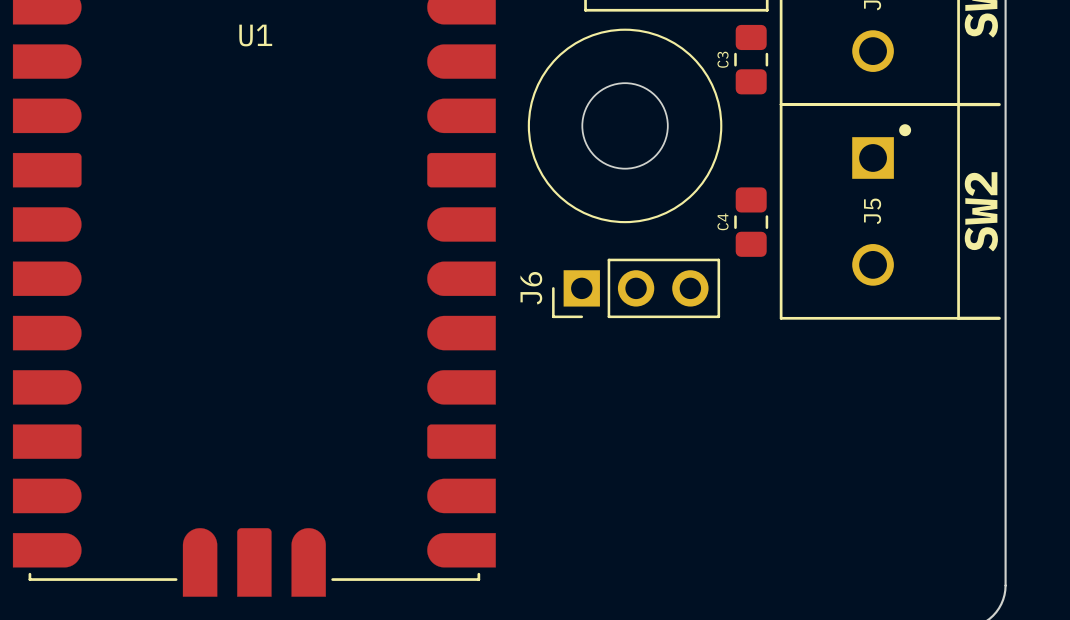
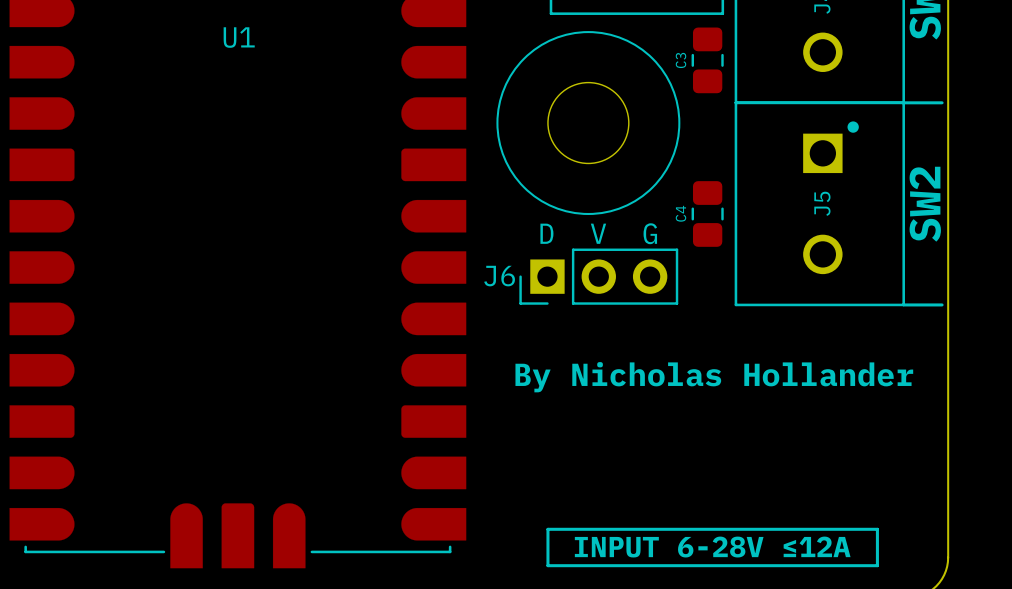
text: none -> D V G (598, 233)
J6 name rotation: 0° (531, 288) -> 90° clockwise (499, 276)
text: none -> By Nicholas Hollander (714, 377)
line: none -> (547, 529) (877, 529) (877, 565) (547, 565) (547, 529)
text: none -> INPUT 6-28V ≤12A (712, 547)

